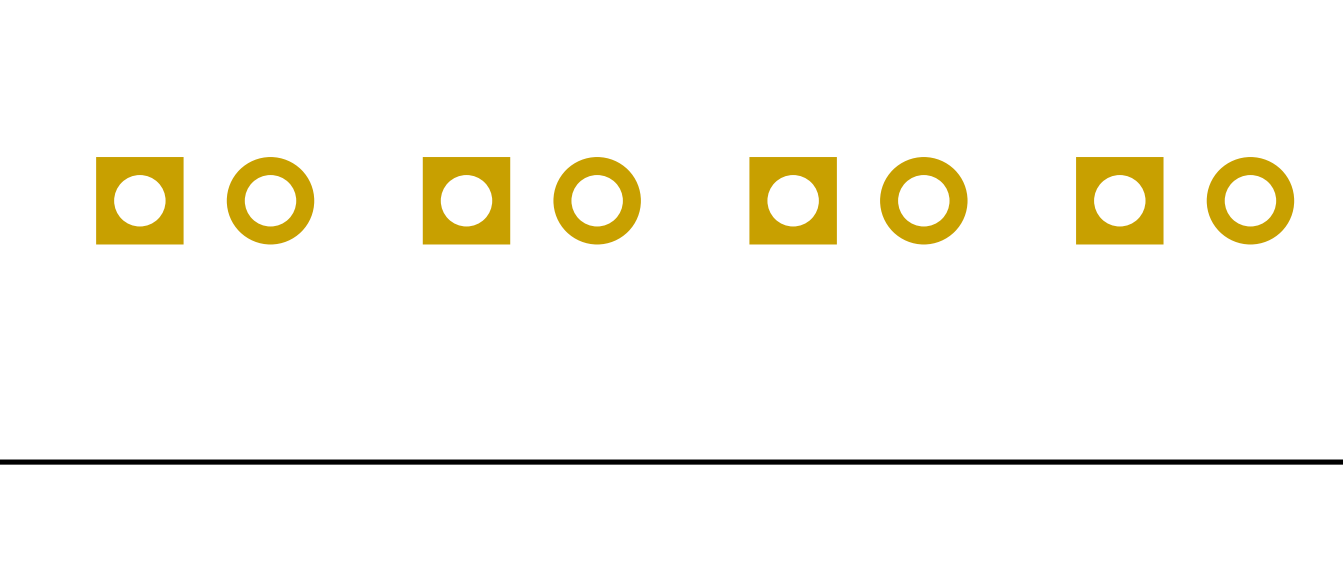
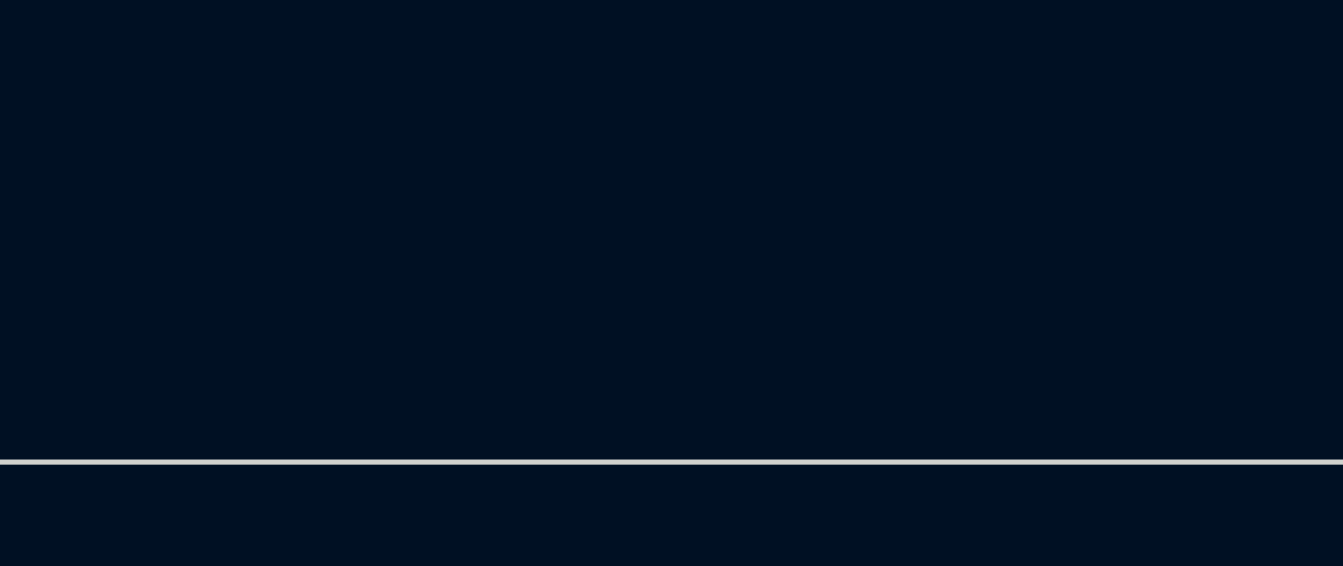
part: (205, 200) -> none
part: (531, 200) -> none
part: (858, 200) -> none
part: (1185, 200) -> none

